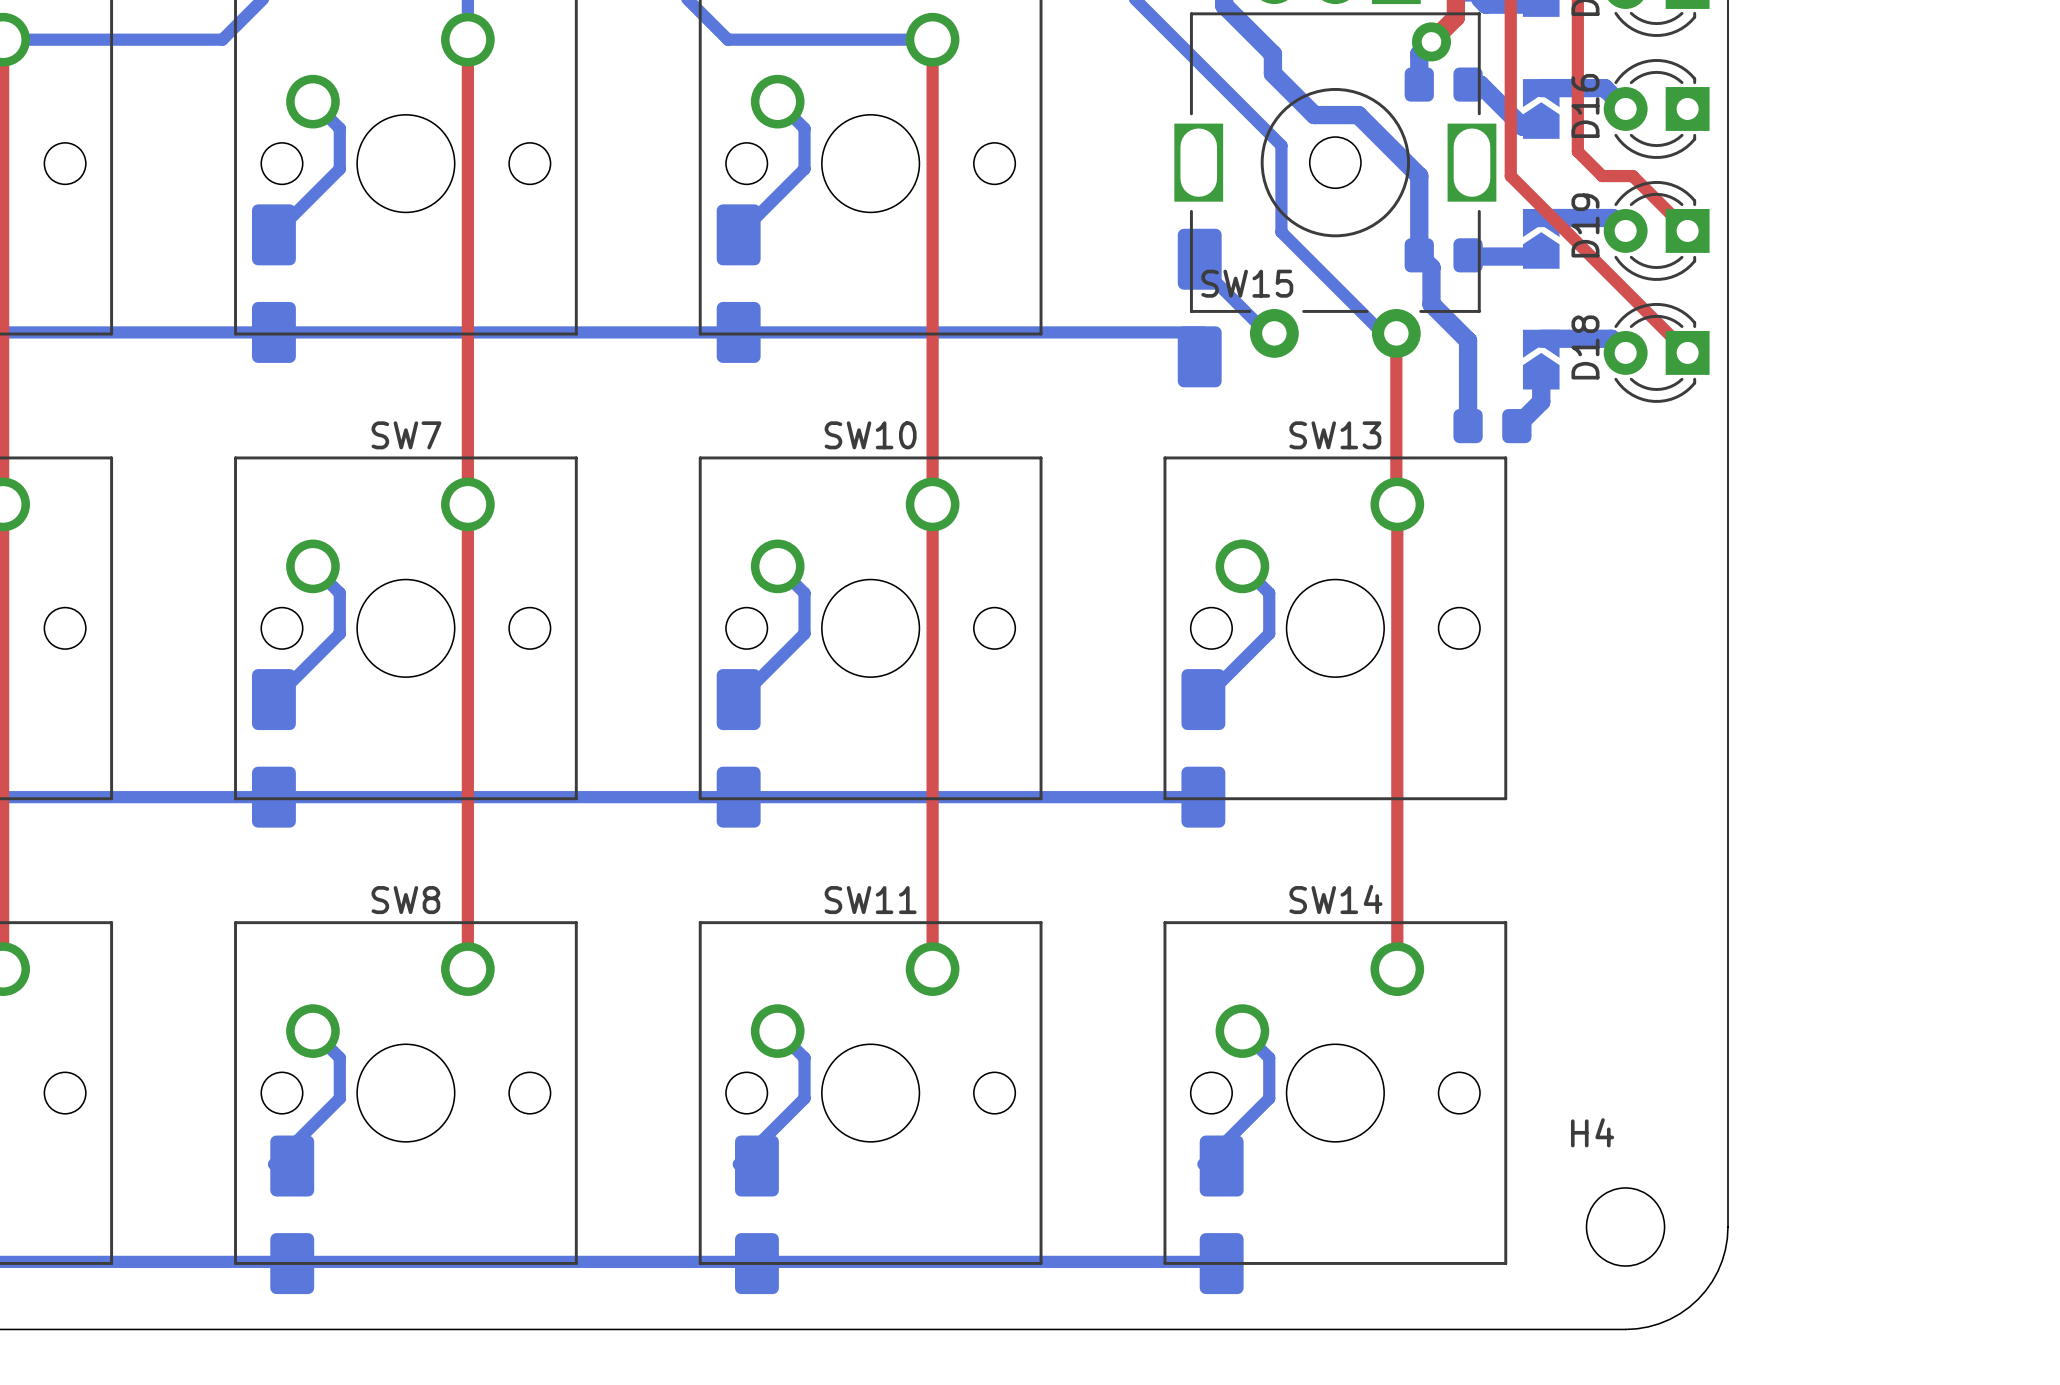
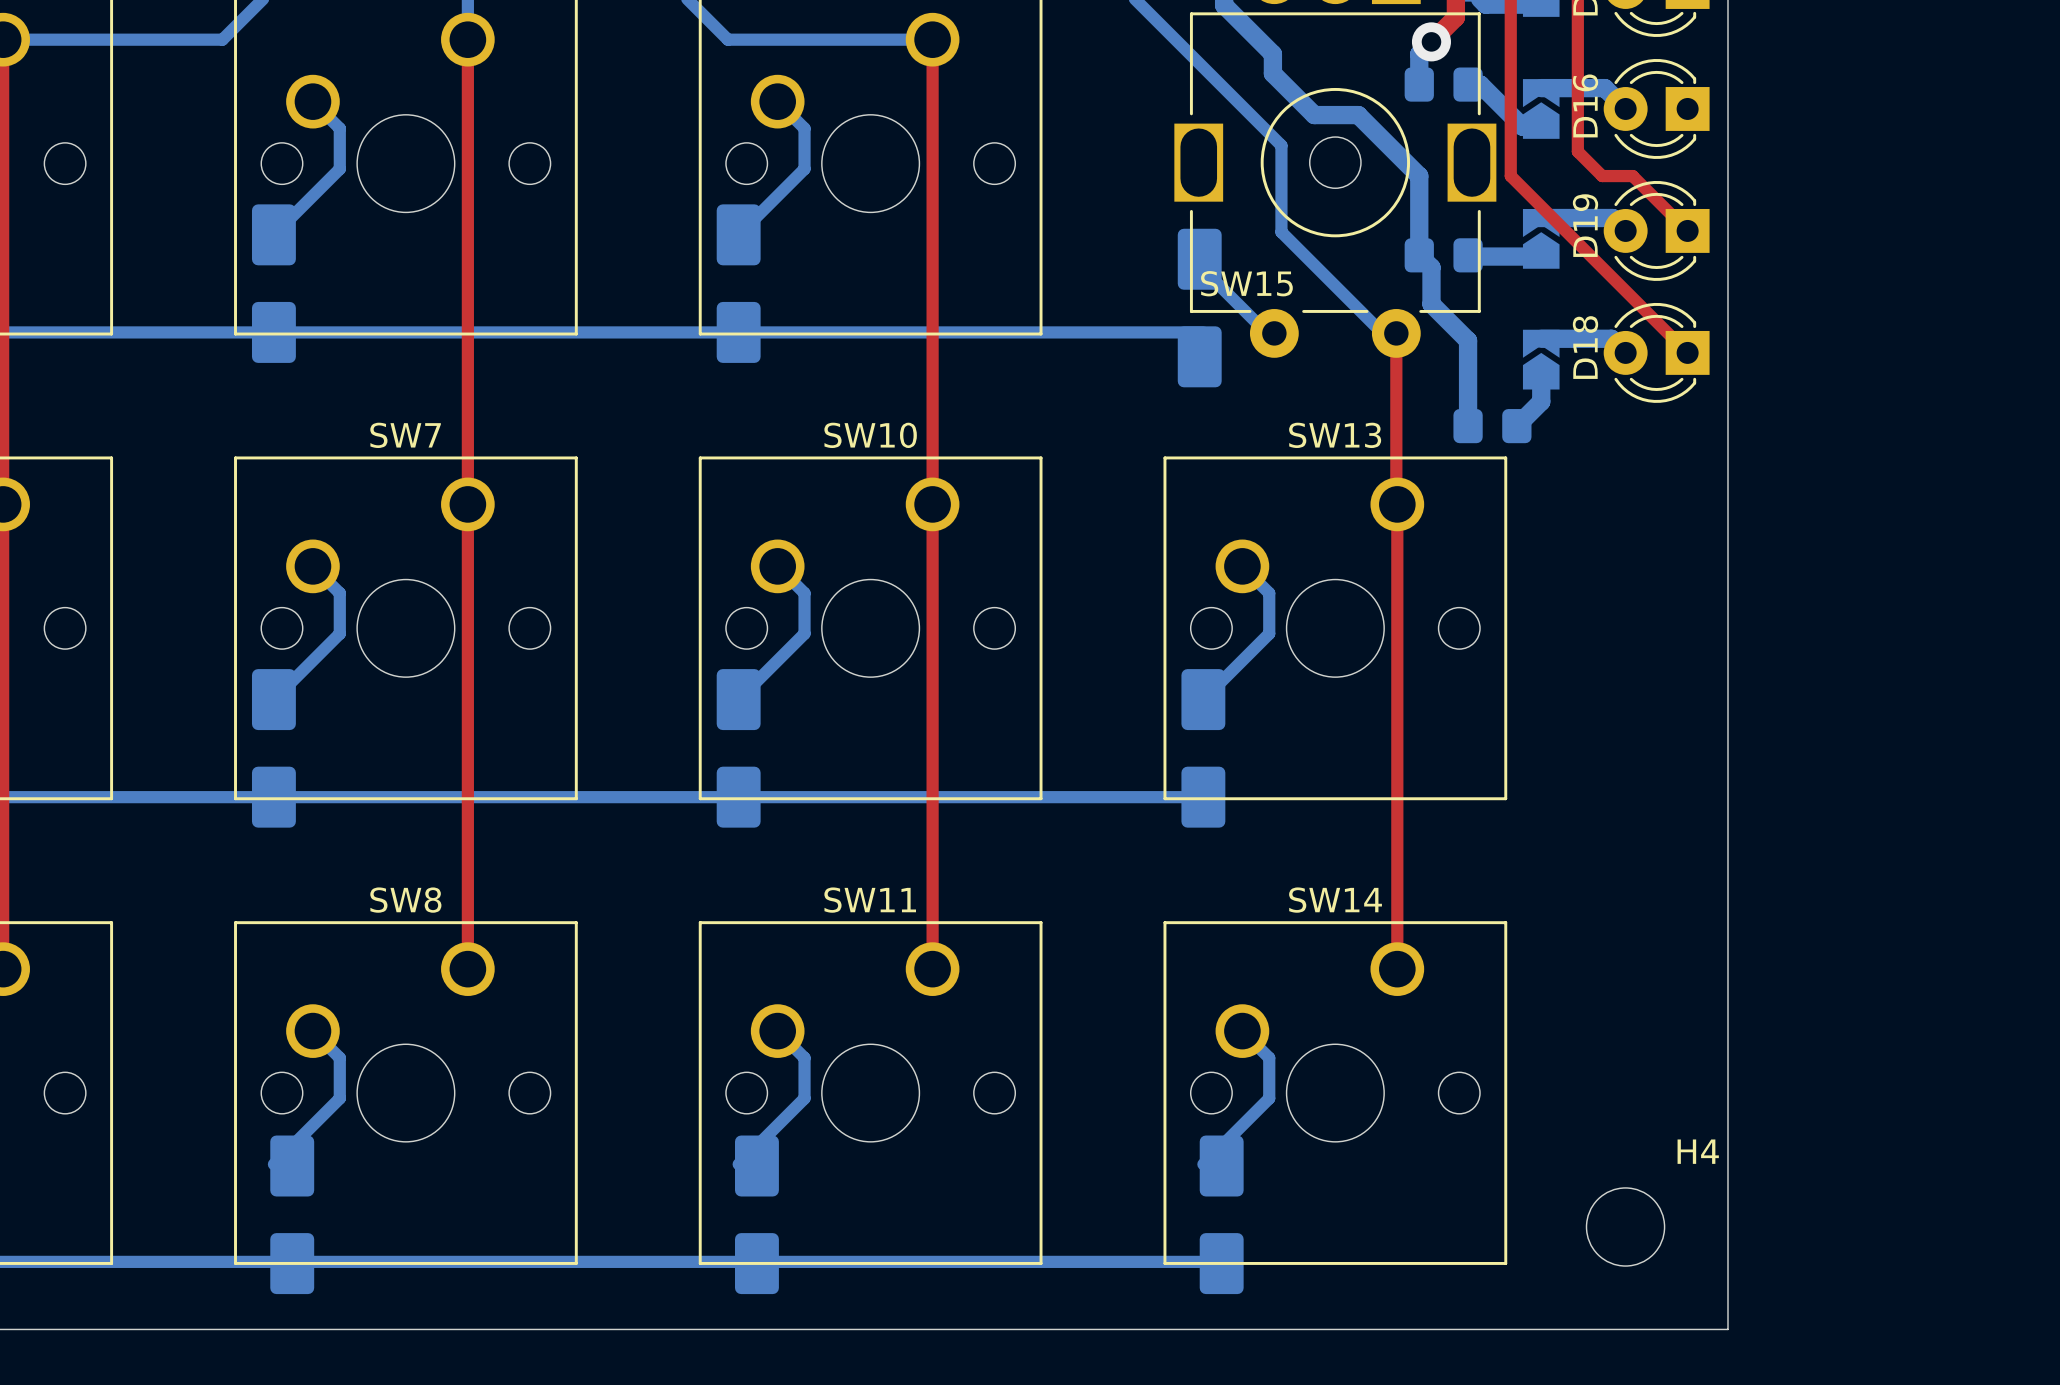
H4 name position: H4 (1592, 1132) -> H4 (1698, 1151)
board edge: (1728, 1226) (1725, 1249) (1717, 1271) (1697, 1299) (1669, 1319) (1648, 1326) (1625, 1329) -> (1728, 1226) (1728, 1329) (1625, 1329)

